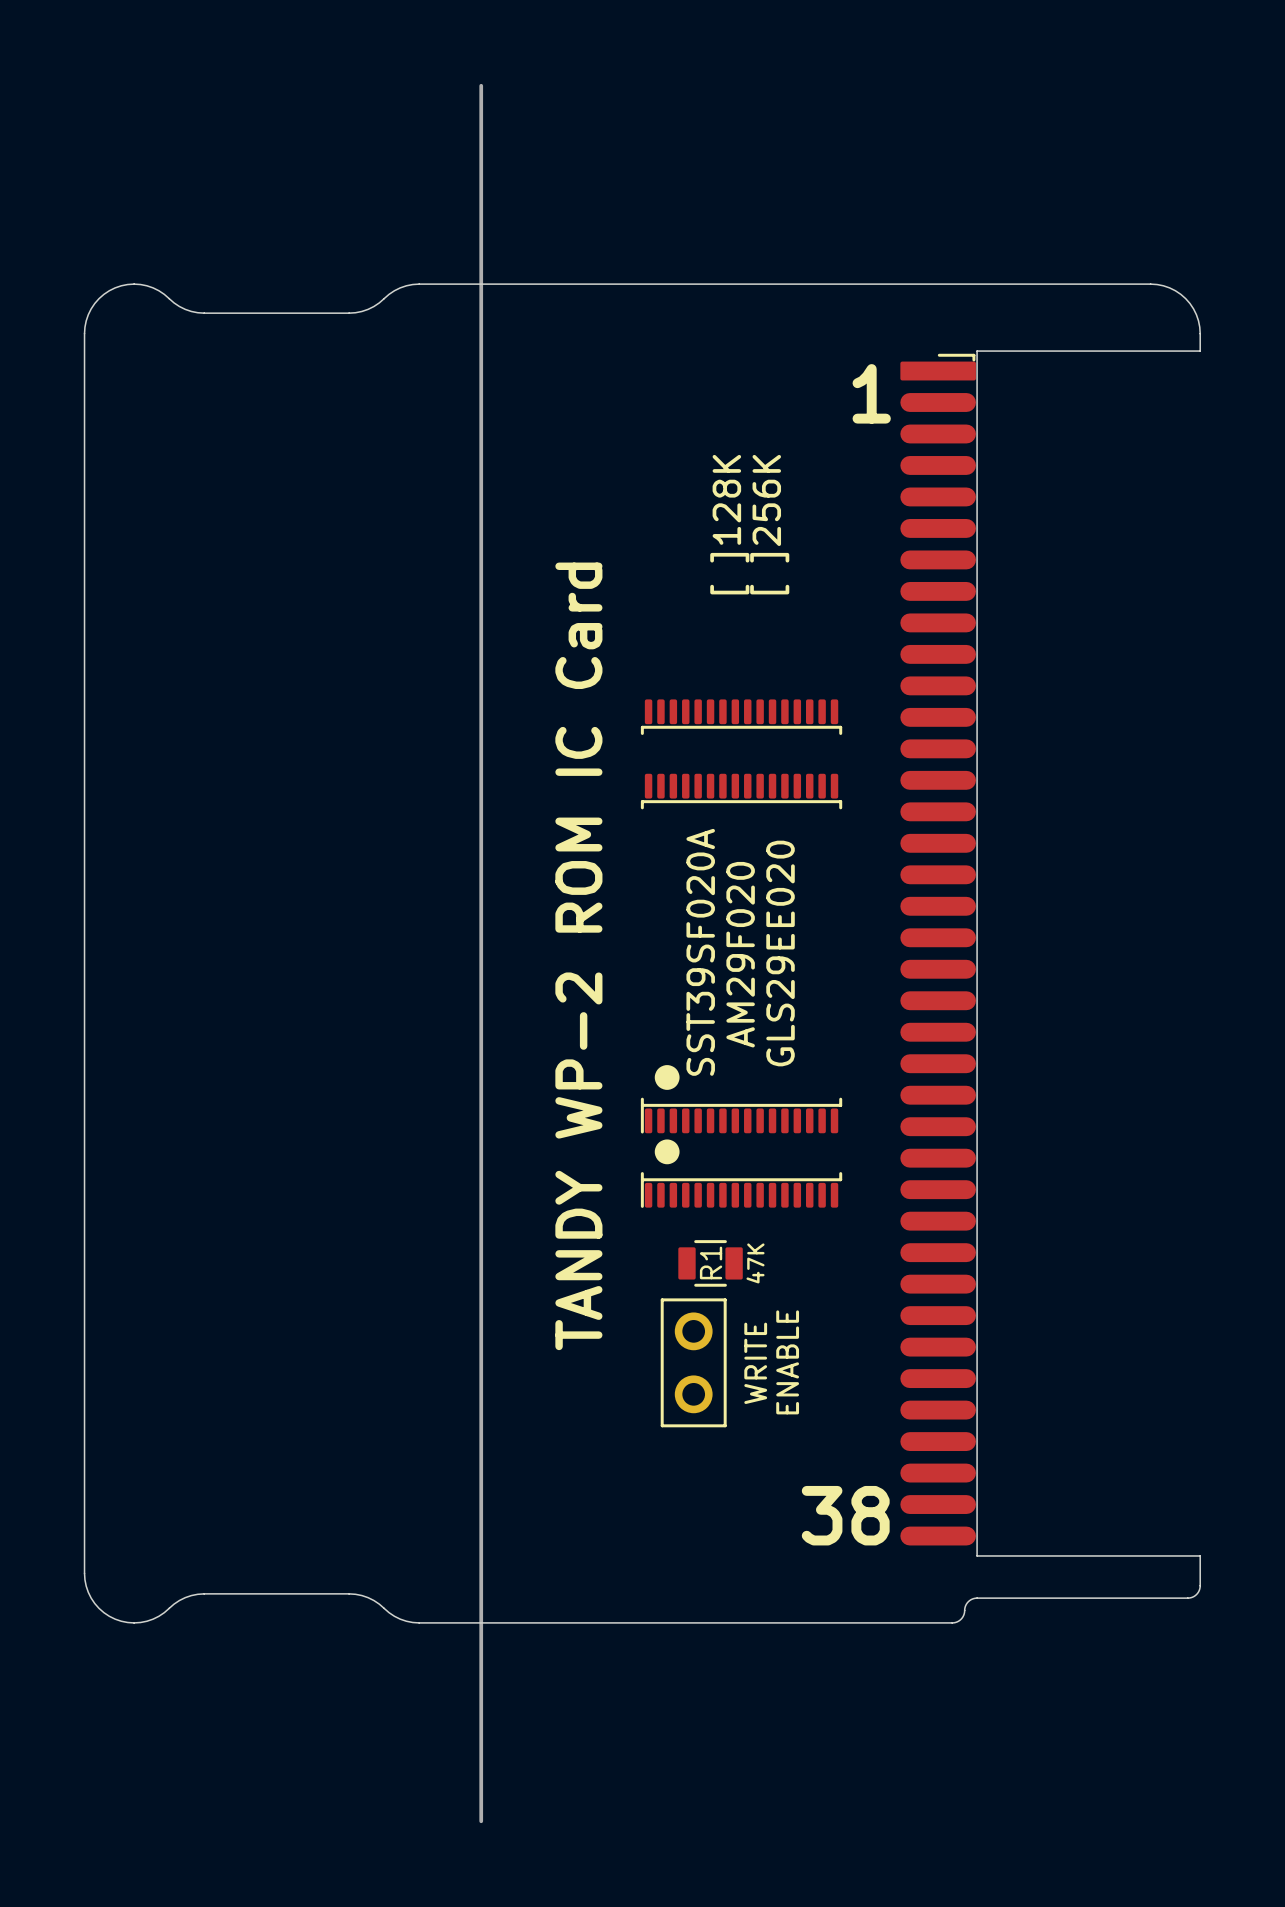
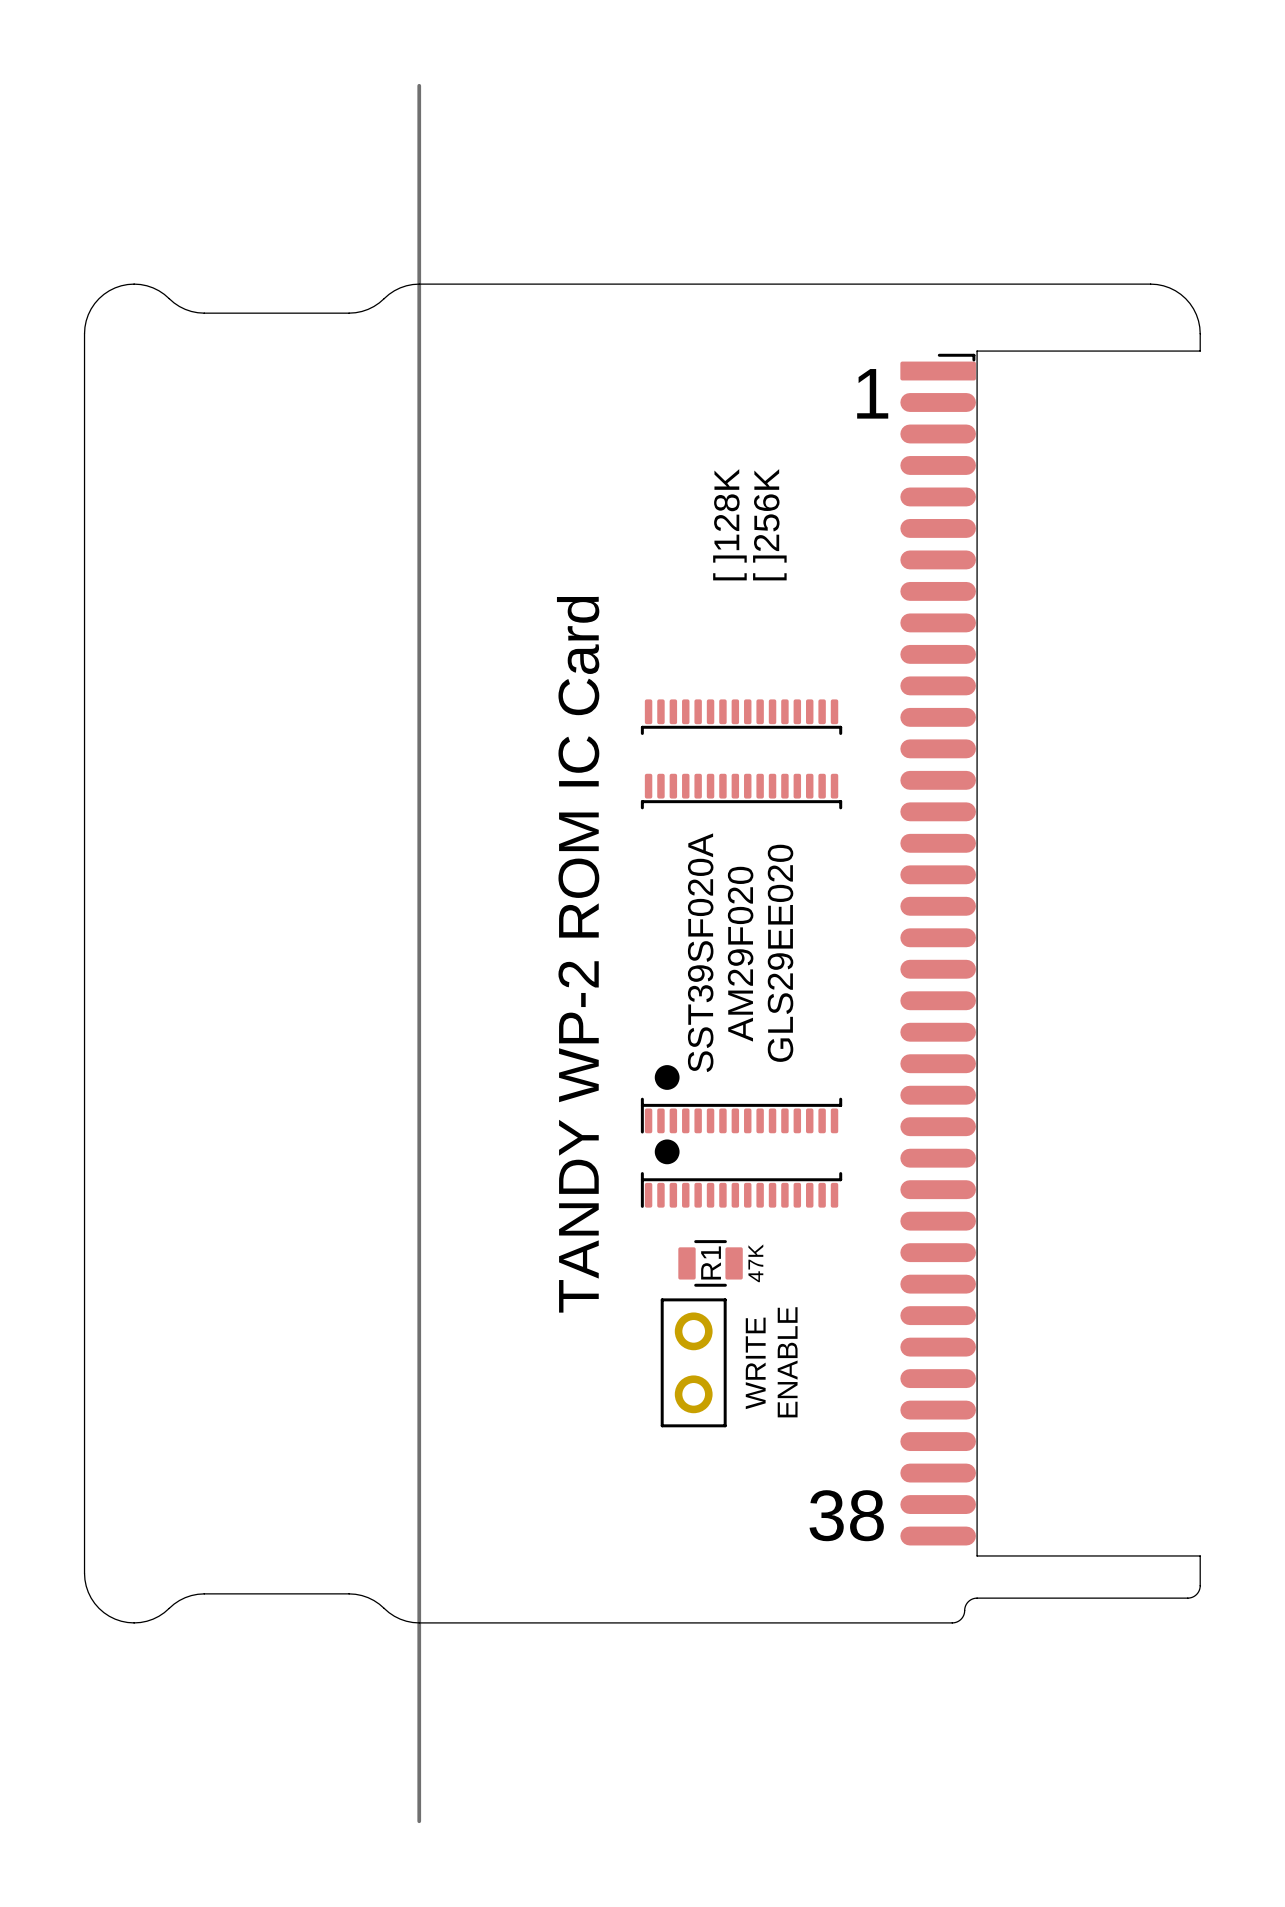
line: (481, 85) (481, 1821) -> (419, 85) (419, 1821)

